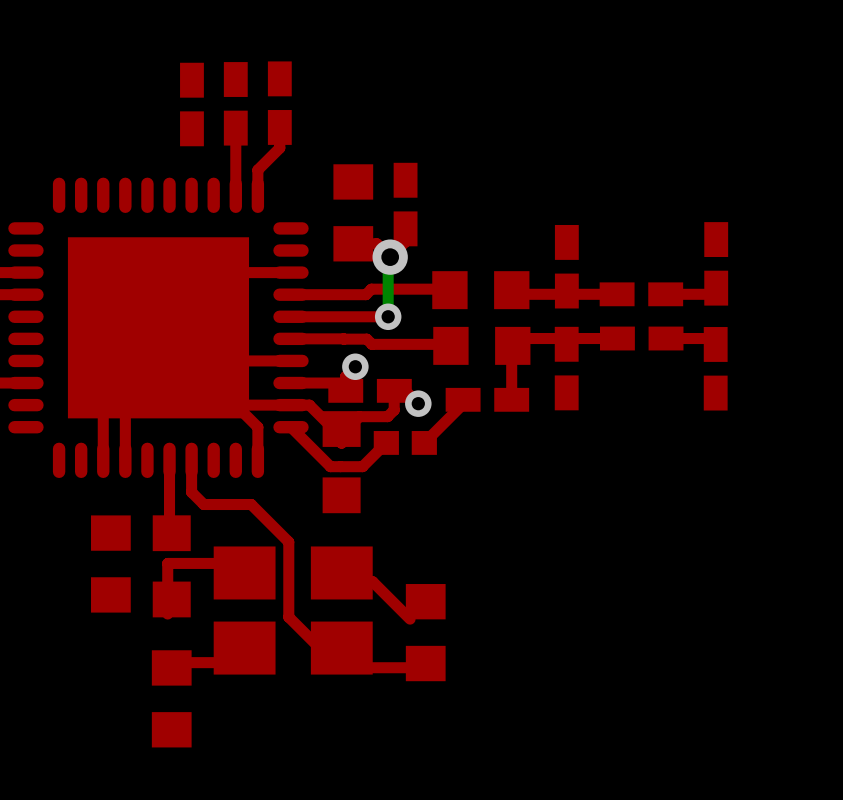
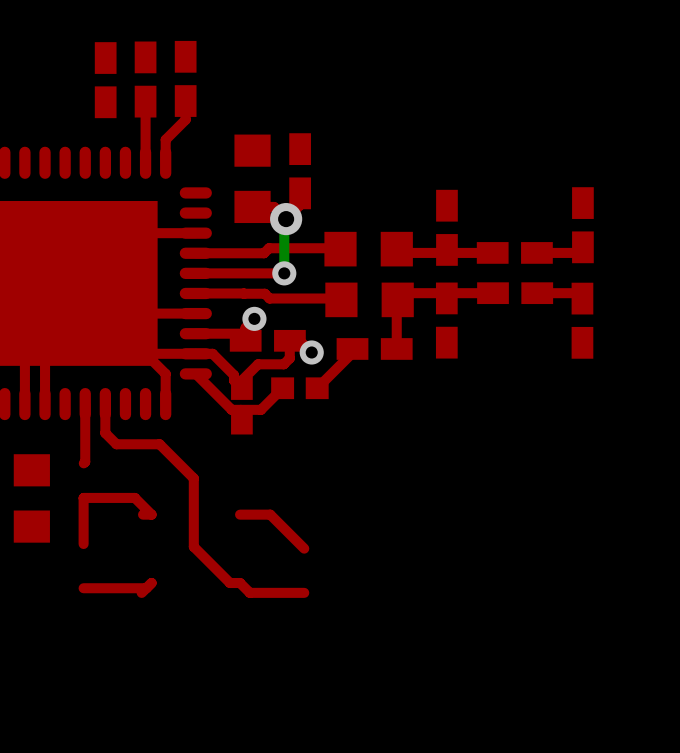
part footprint: [322, 411, 361, 514] -> [231, 376, 253, 435]
part: (171, 566) -> none
part: (293, 610) -> none
part: (425, 632) -> none
part: (171, 698) -> none

